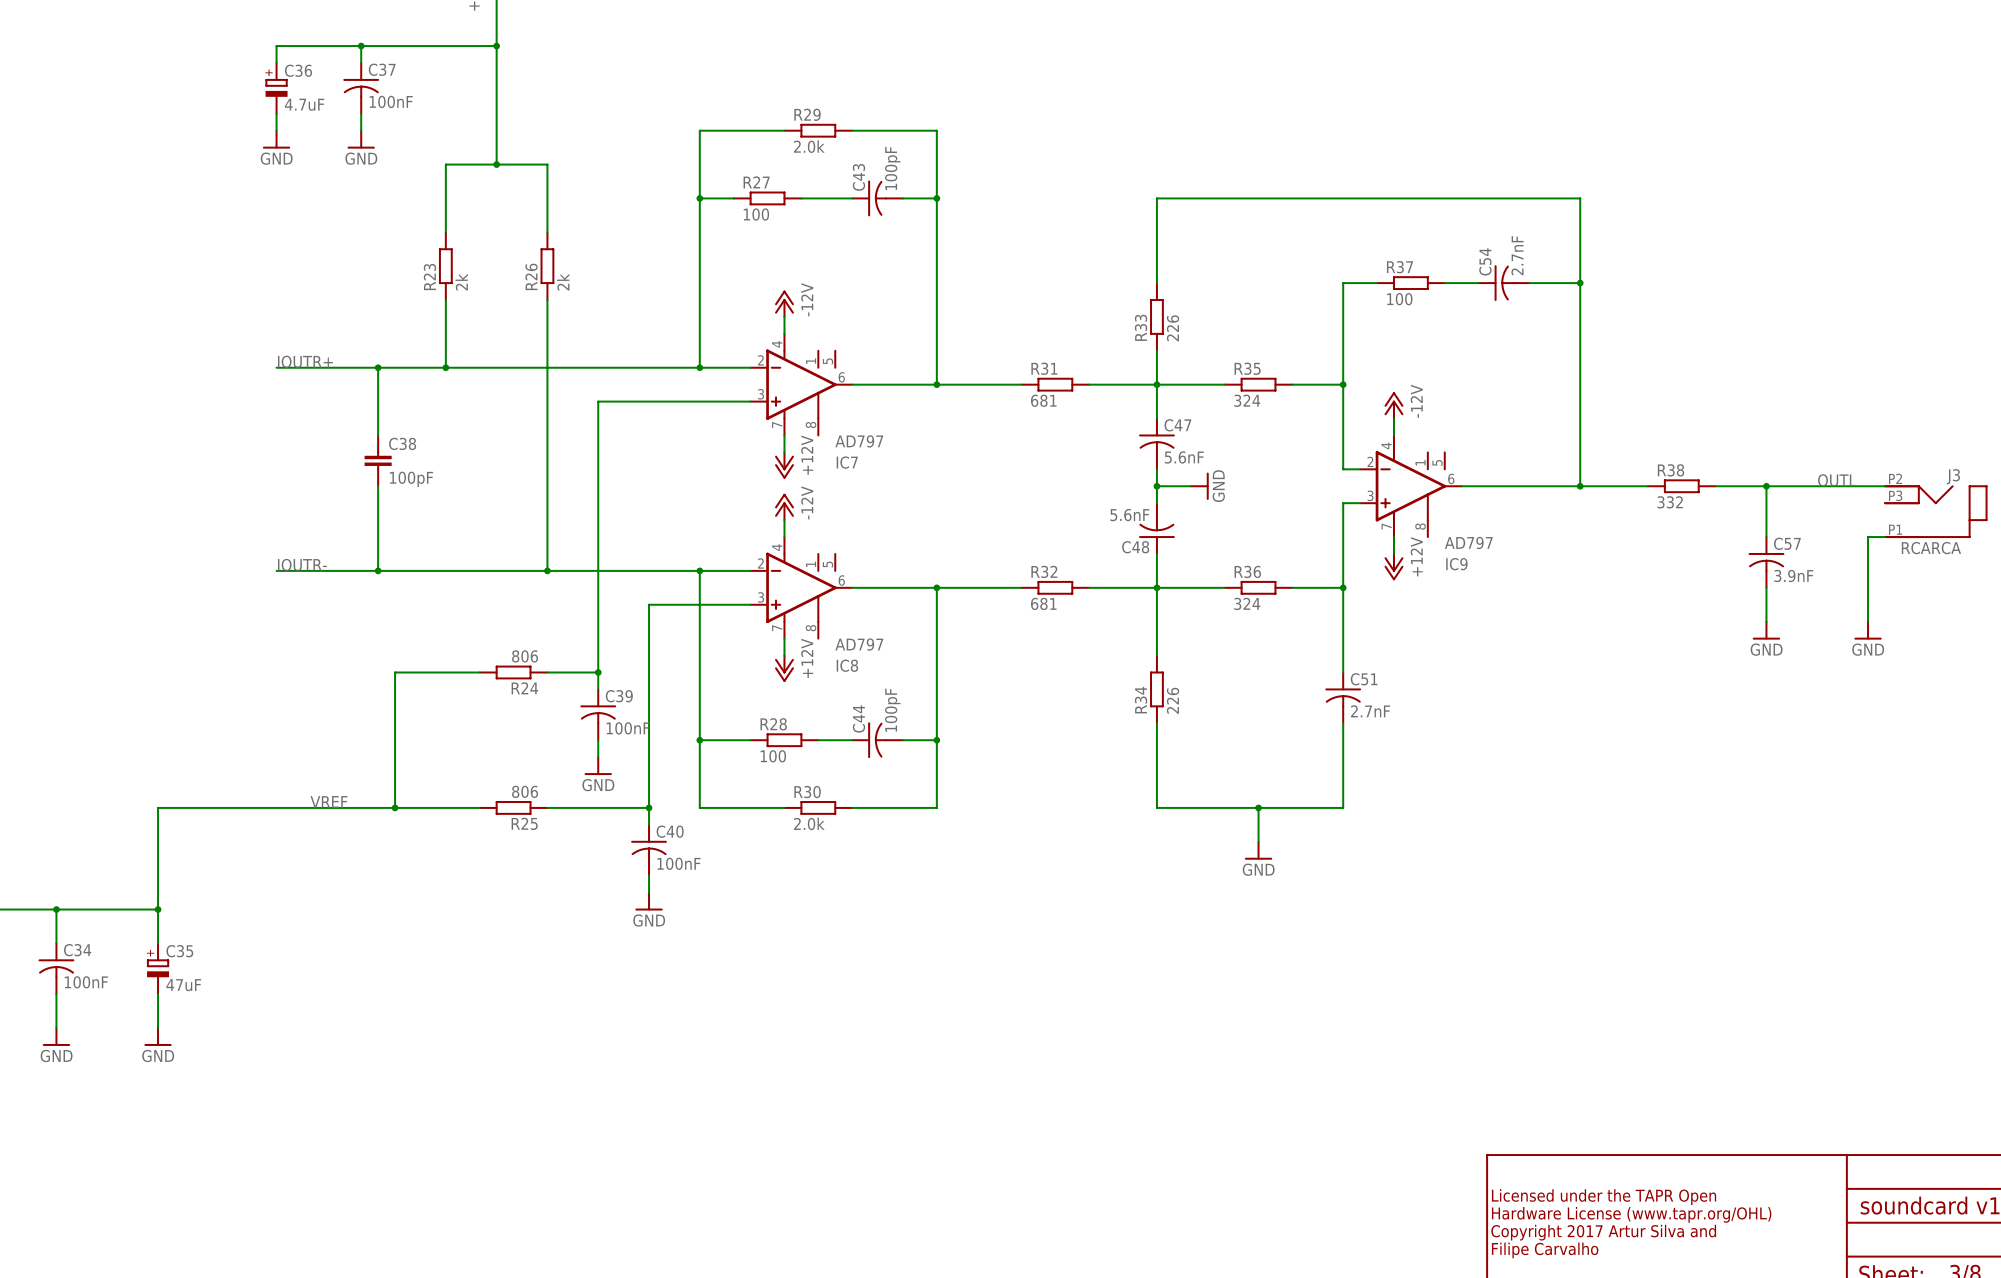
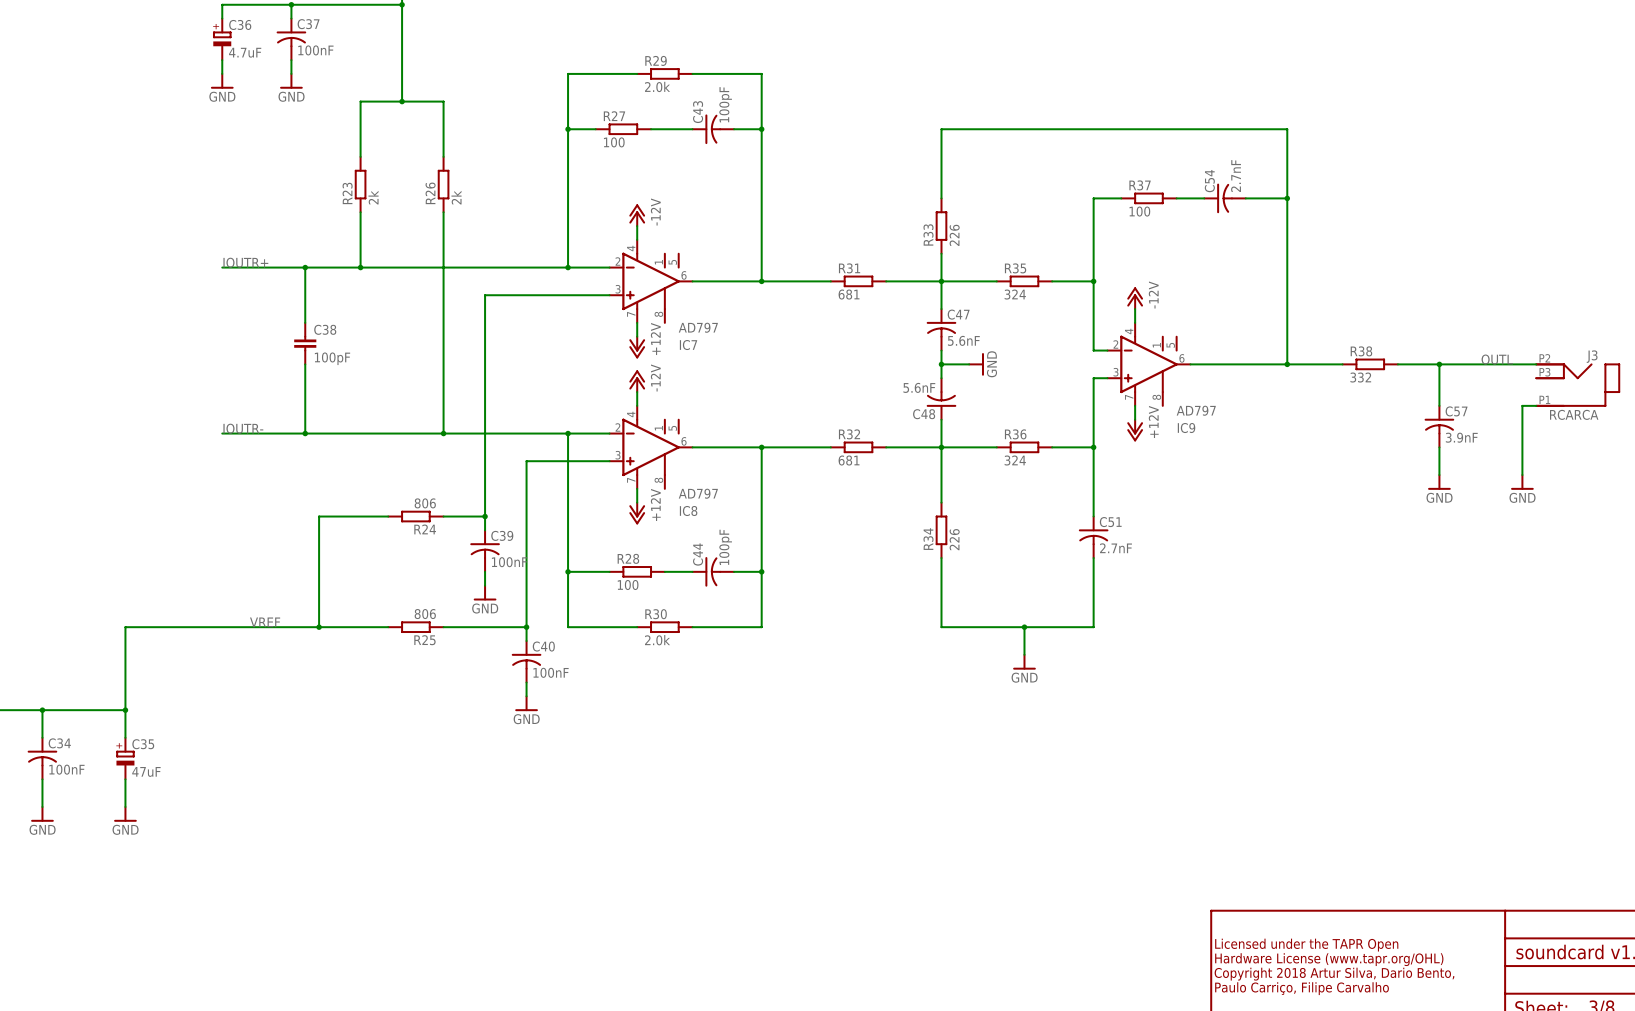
text: Copyright 2017 Artur Silva and (1603, 1232) -> Copyright 2018 Artur Silva, Dario Bento, (1334, 974)
text: Filipe Carvalho (1545, 1250) -> Paulo Carriço, Filipe Carvalho (1302, 988)

